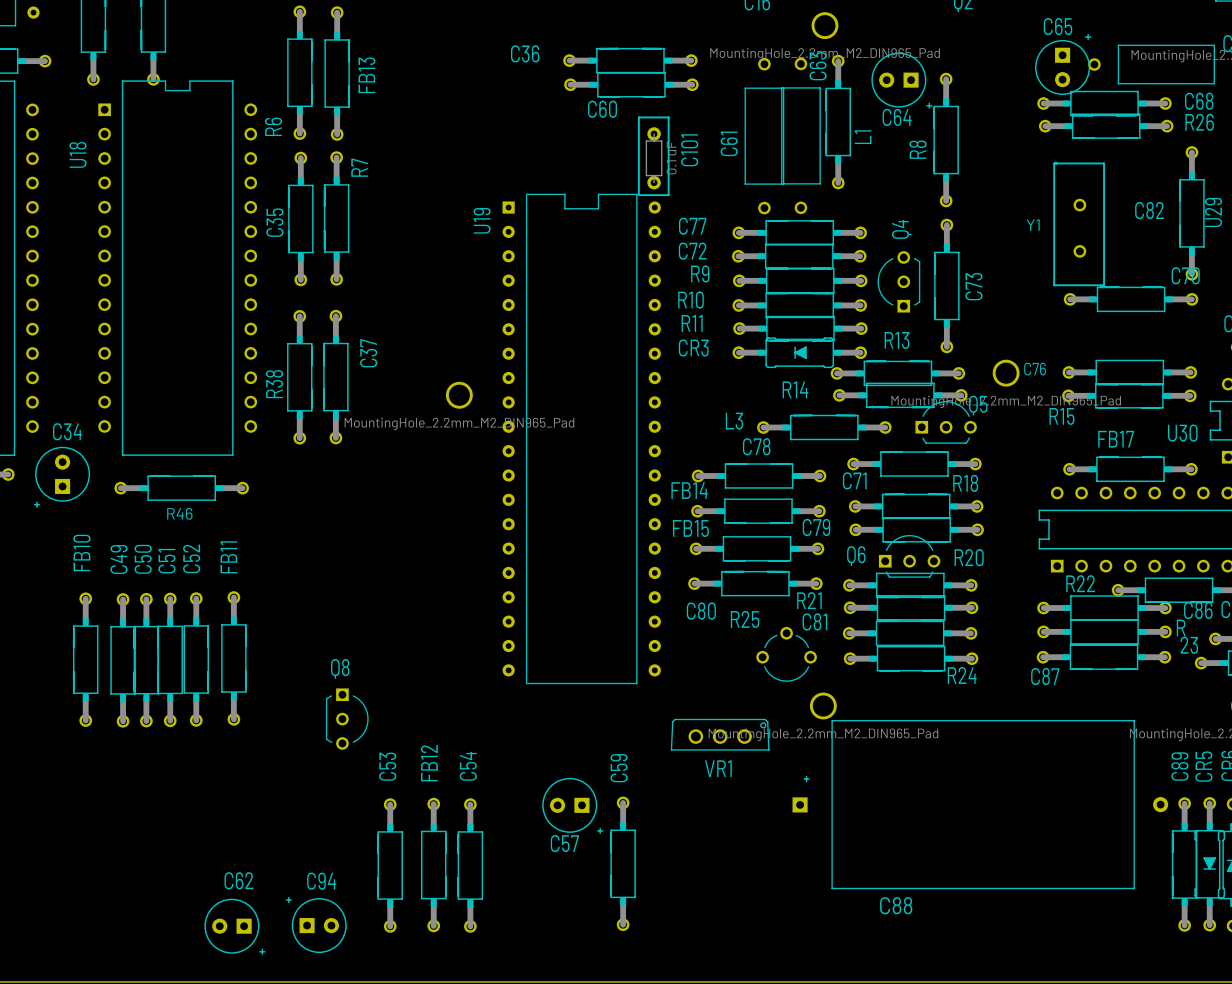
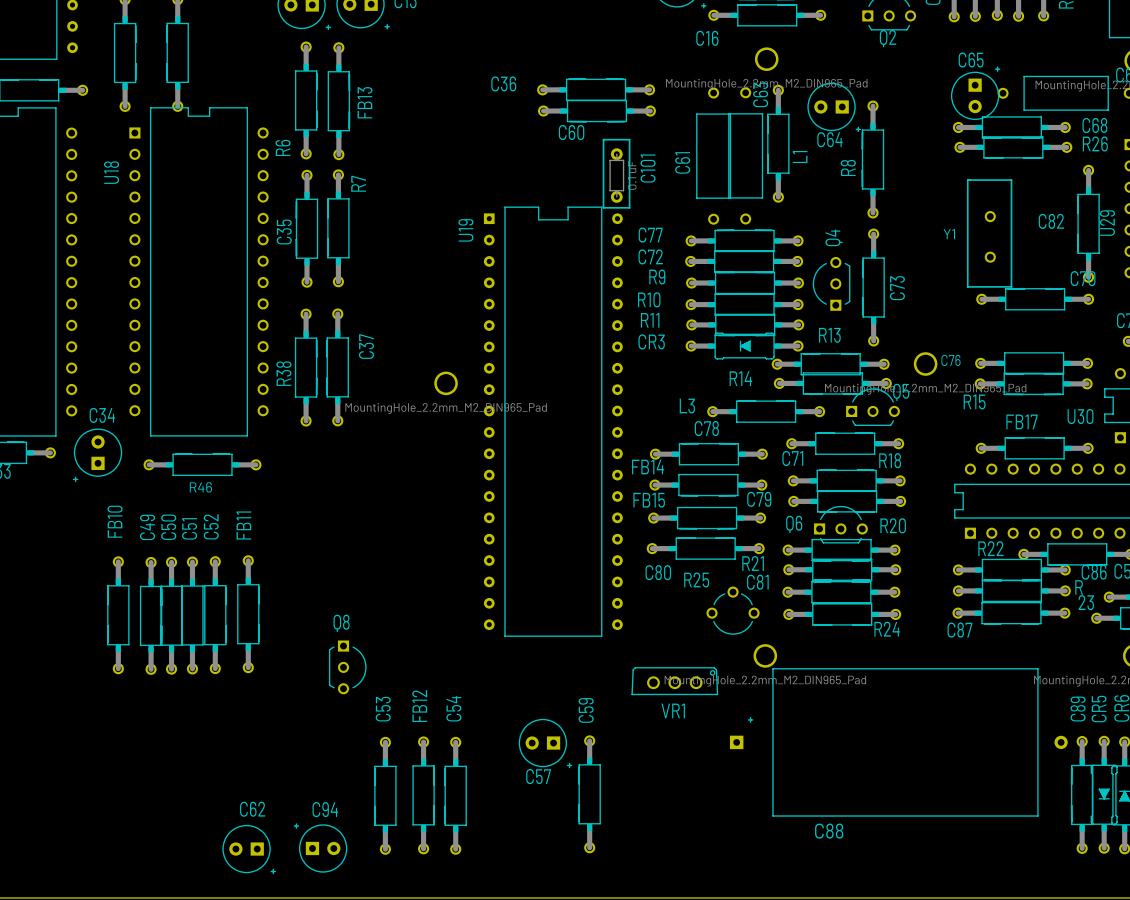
C88 footprint: [792, 720, 1169, 890] -> [729, 668, 1068, 817]

